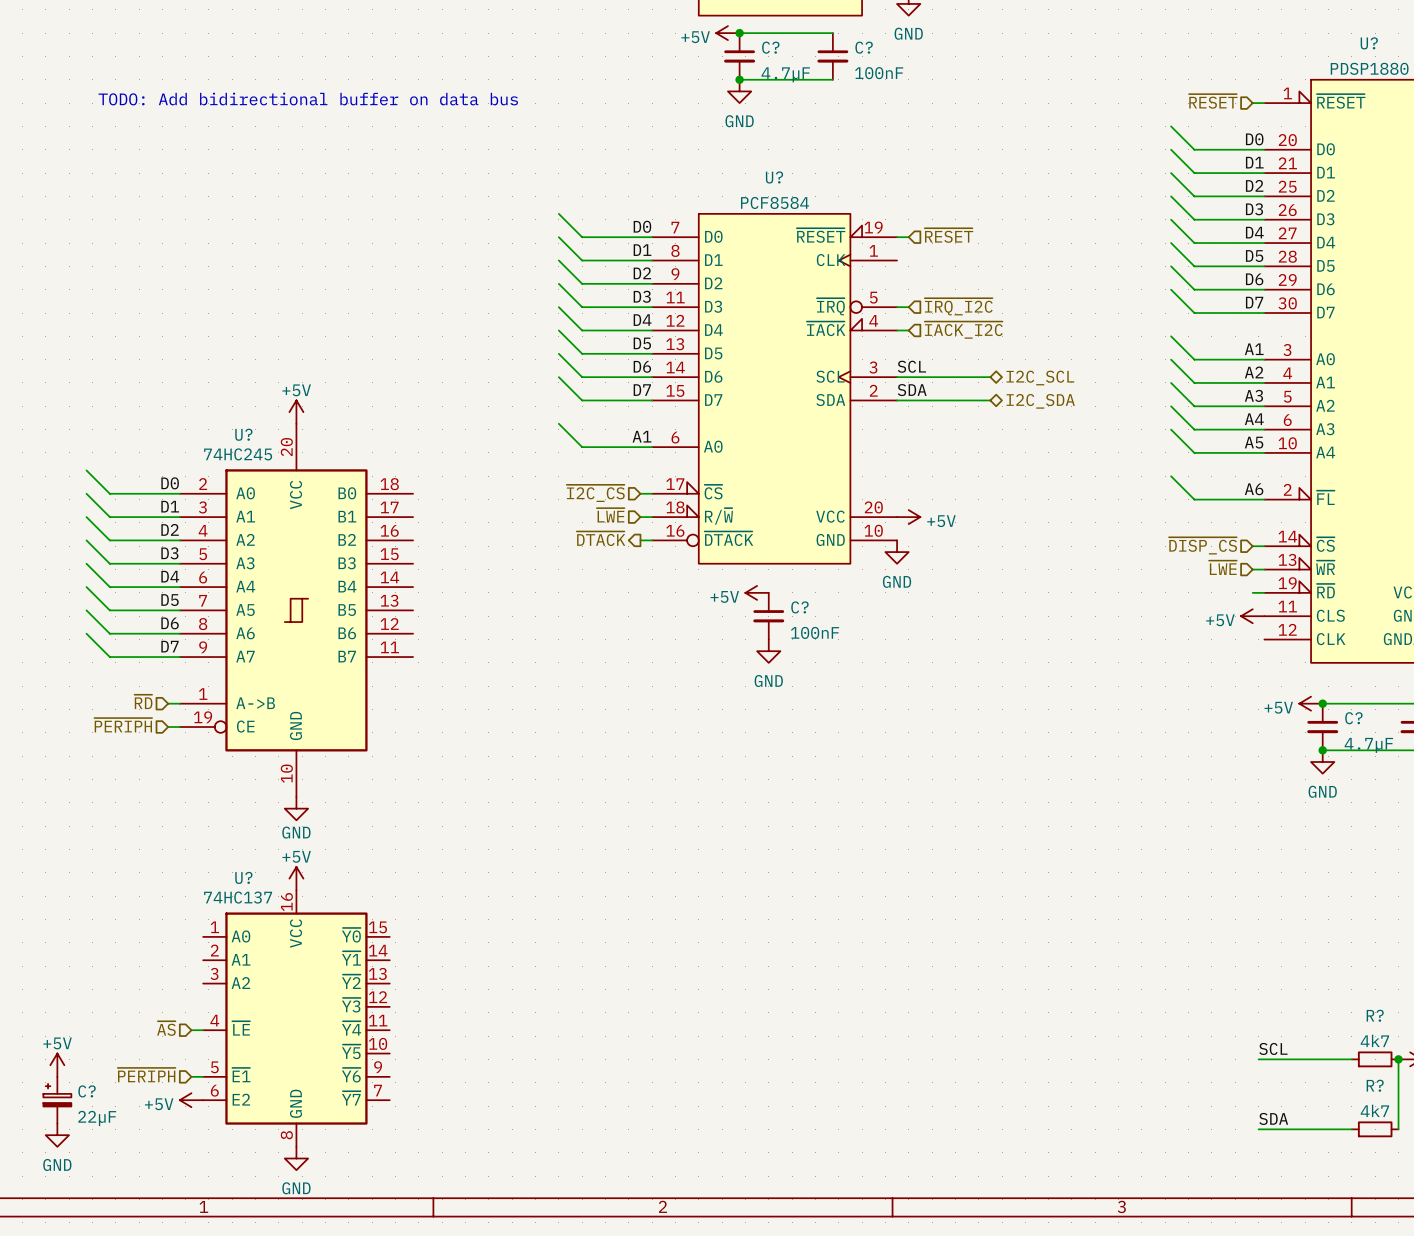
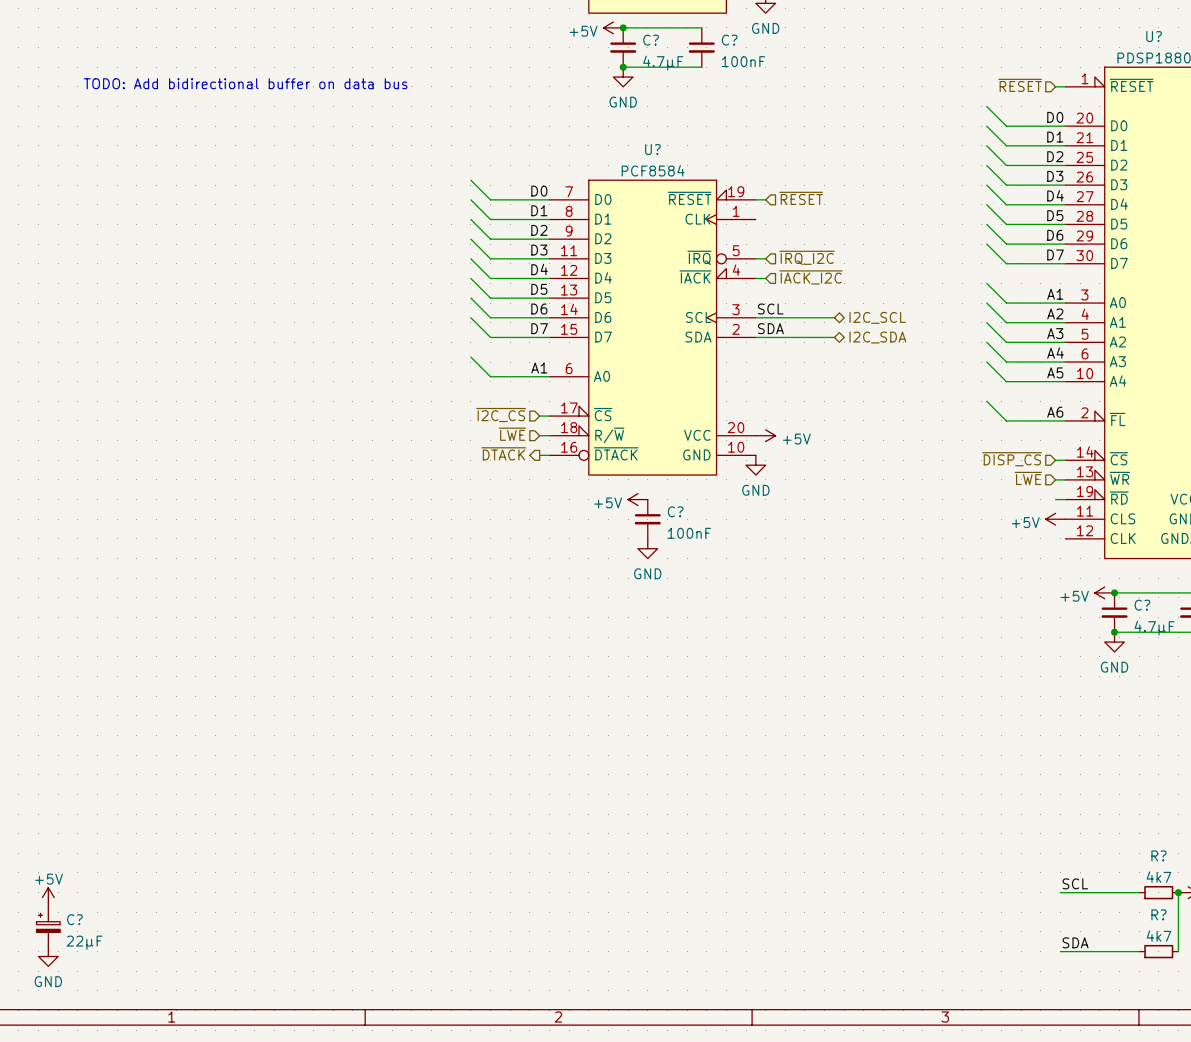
power symbol: +5V (296, 412) -> none
wire: (86, 470) (109, 493) (179, 493) -> none
label: D0 (170, 483) -> none
wire: (86, 493) (109, 517) (179, 517) -> none
label: D1 (170, 506) -> none
wire: (86, 517) (109, 540) (179, 540) -> none
label: D2 (170, 529) -> none
wire: (86, 540) (109, 563) (179, 563) -> none
label: D3 (169, 553) -> none
wire: (86, 563) (109, 587) (179, 587) -> none
label: D4 (170, 576) -> none
wire: (86, 587) (109, 610) (179, 610) -> none
label: D5 (170, 600) -> none
wire: (86, 610) (109, 633) (179, 633) -> none
U?: 74HC245 (296, 610) -> none
label: D6 (170, 623) -> none
wire: (86, 633) (109, 657) (179, 657) -> none
label: D7 (170, 646) -> none
hierarchical label: ~{RD} (143, 701) -> none
wire: (168, 703) (179, 703) -> none
hierarchical label: ~{PERIPH} (123, 725) -> none
wire: (168, 727) (179, 727) -> none
power symbol: GND (296, 808) -> none
power symbol: +5V (296, 878) -> none
U?: 74HC137 (296, 1018) -> none
hierarchical label: ~{AS} (166, 1028) -> none
wire: (191, 1030) (203, 1030) -> none
hierarchical label: ~{PERIPH} (146, 1075) -> none
wire: (191, 1076) (203, 1076) -> none
power symbol: +5V (191, 1100) -> none
power symbol: GND (296, 1158) -> none

